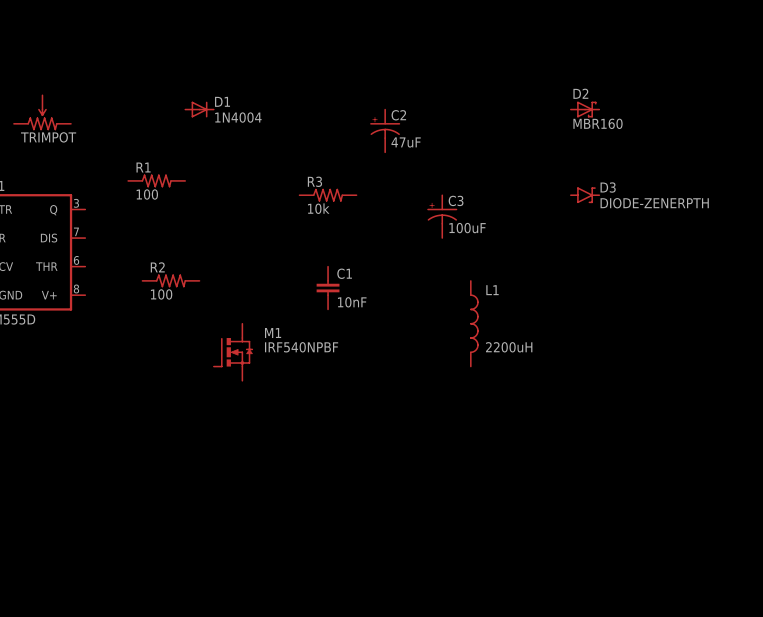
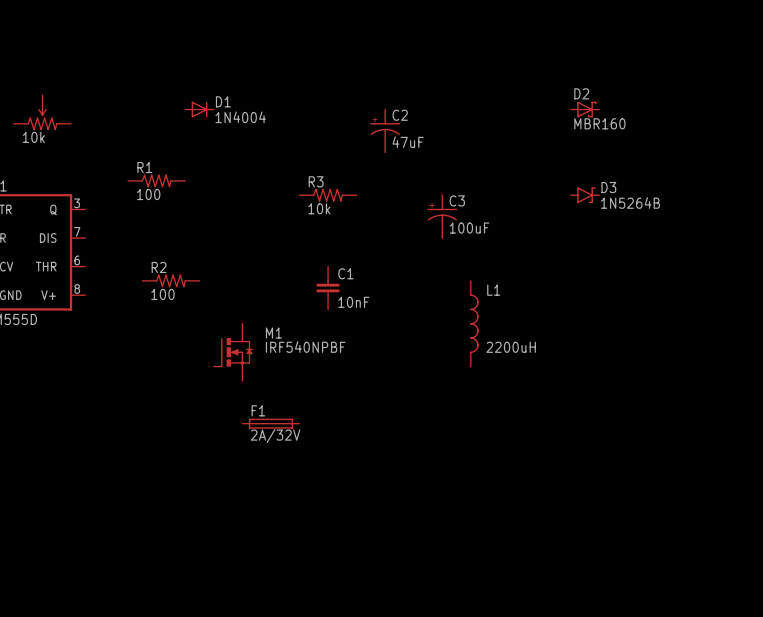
part value: TRIMPOT (48, 137) -> 10k (33, 137)
D3 value: DIODE-ZENERPTH (654, 203) -> 1N5264B (630, 202)
F1: none -> 2A/32V (270, 423)

